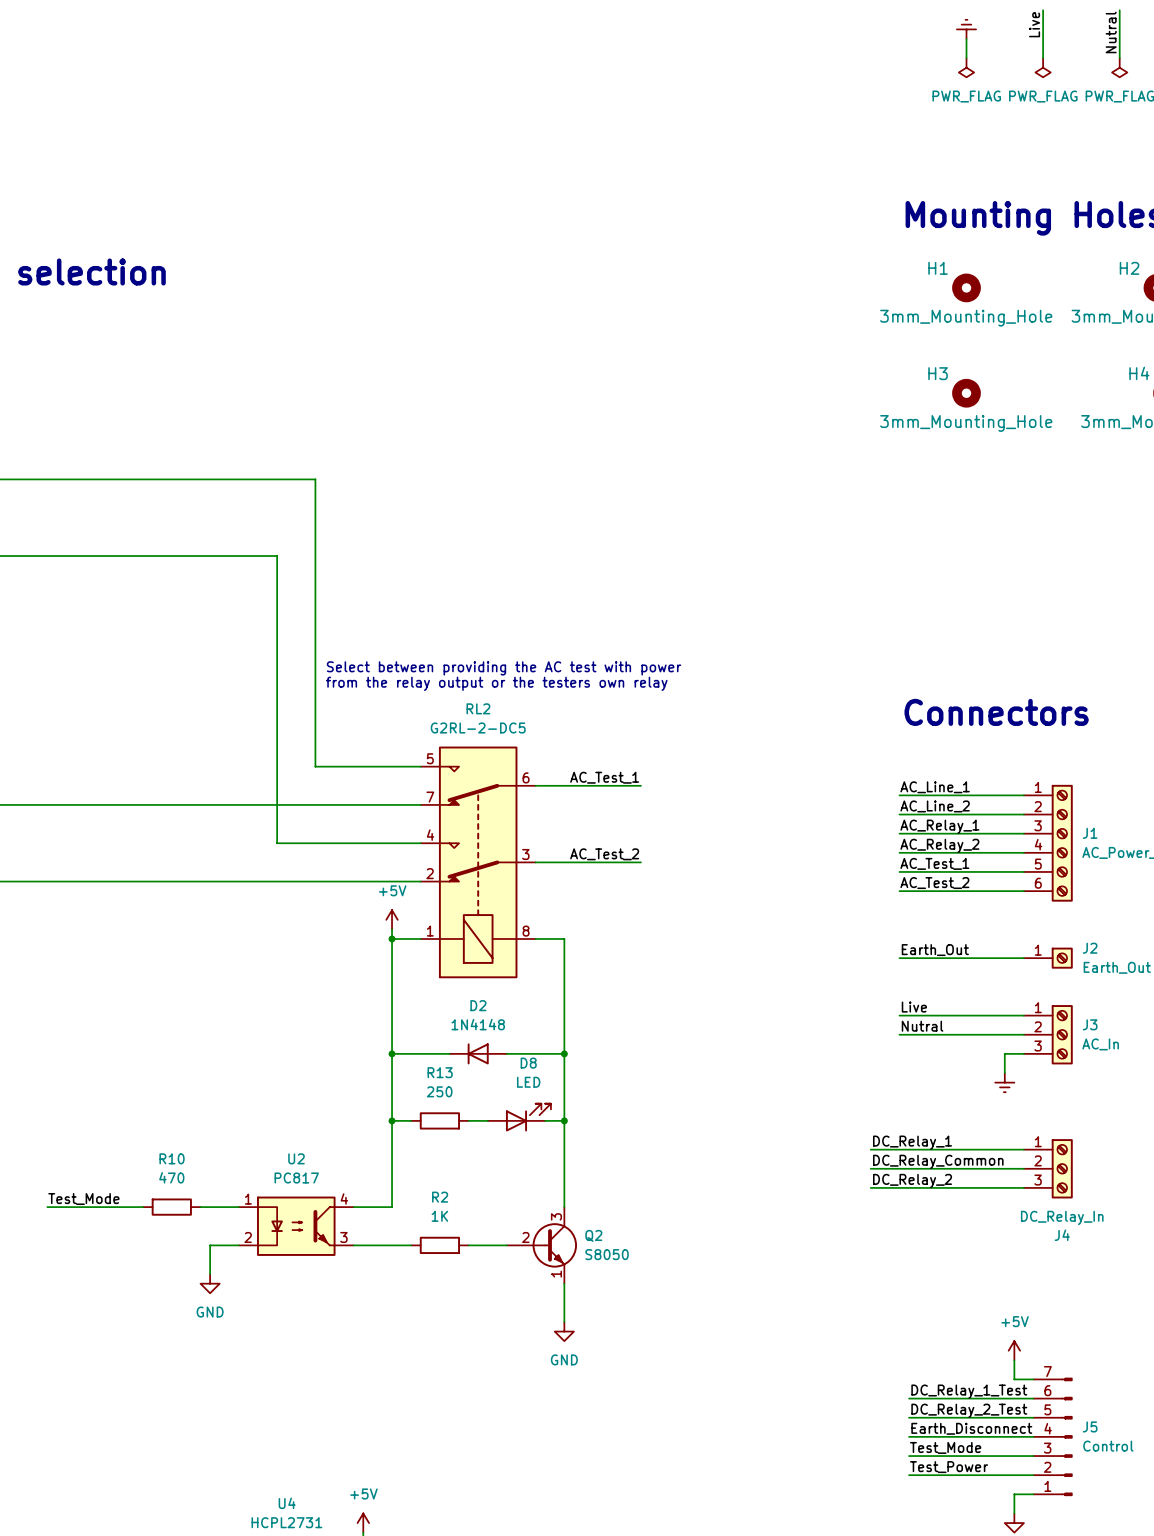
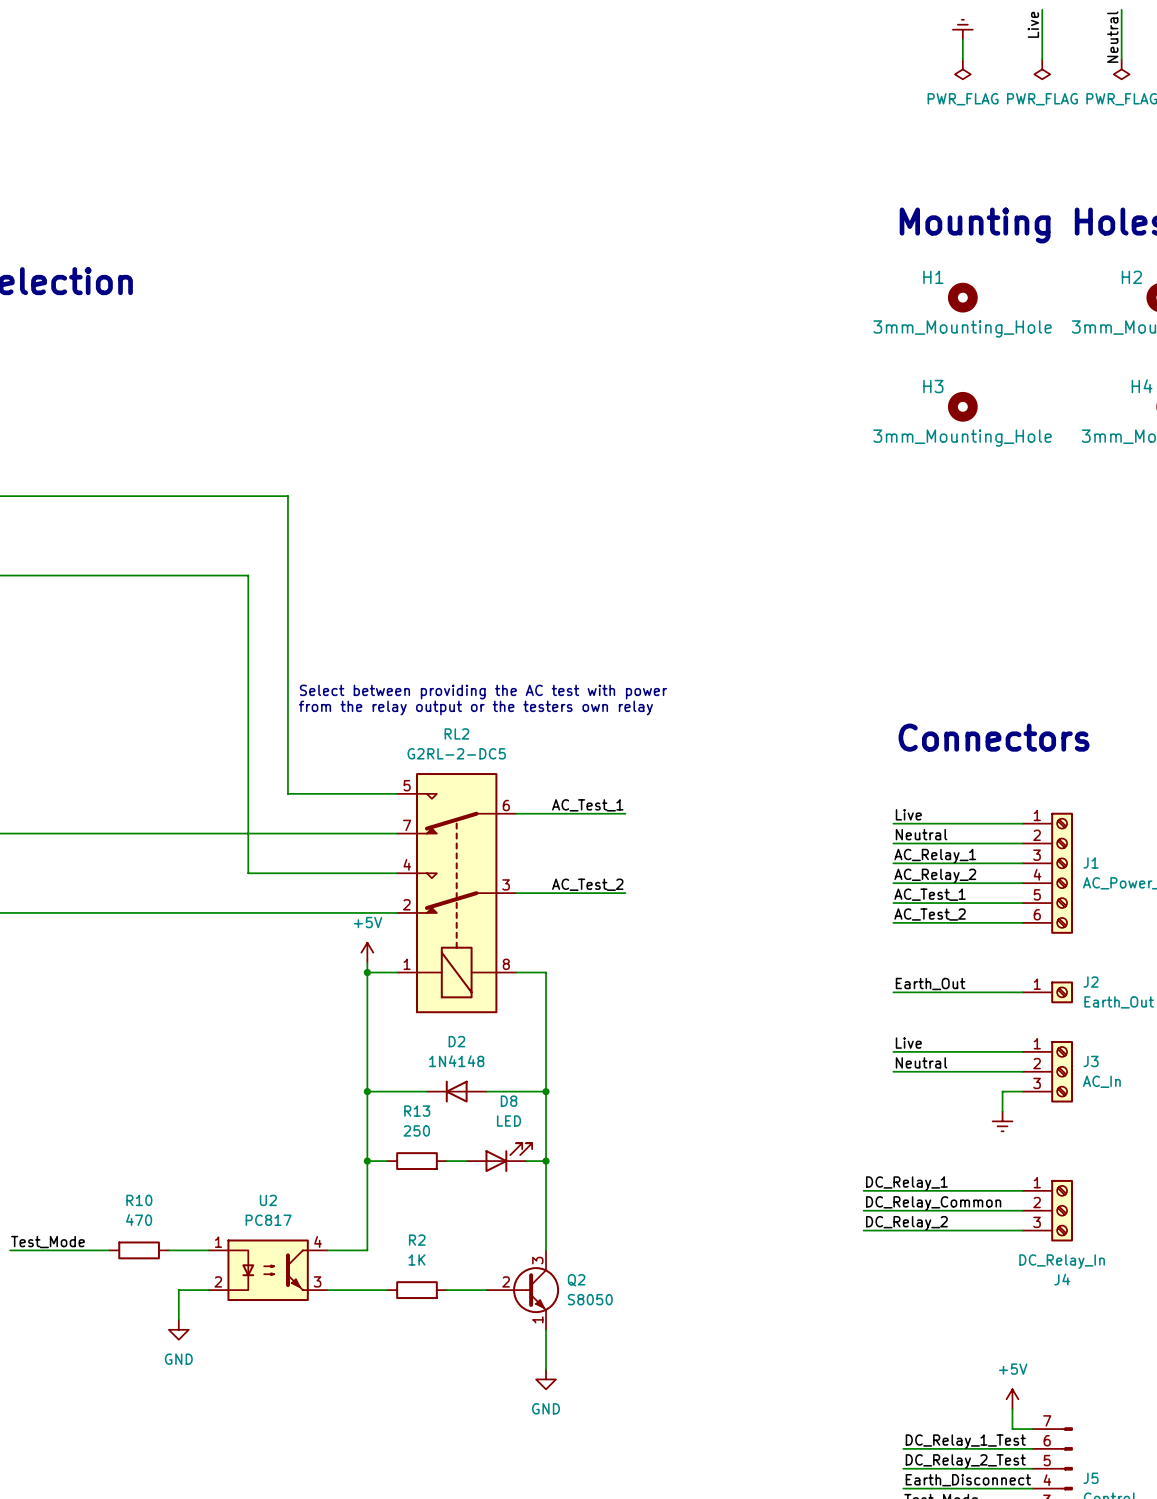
label: Nutral (1111, 32) -> Neutral (1112, 37)
label: AC_Line_1 (935, 787) -> Live (908, 814)
label: AC_Line_2 (935, 806) -> Neutral (921, 834)
label: Nutral (922, 1026) -> Neutral (921, 1062)

